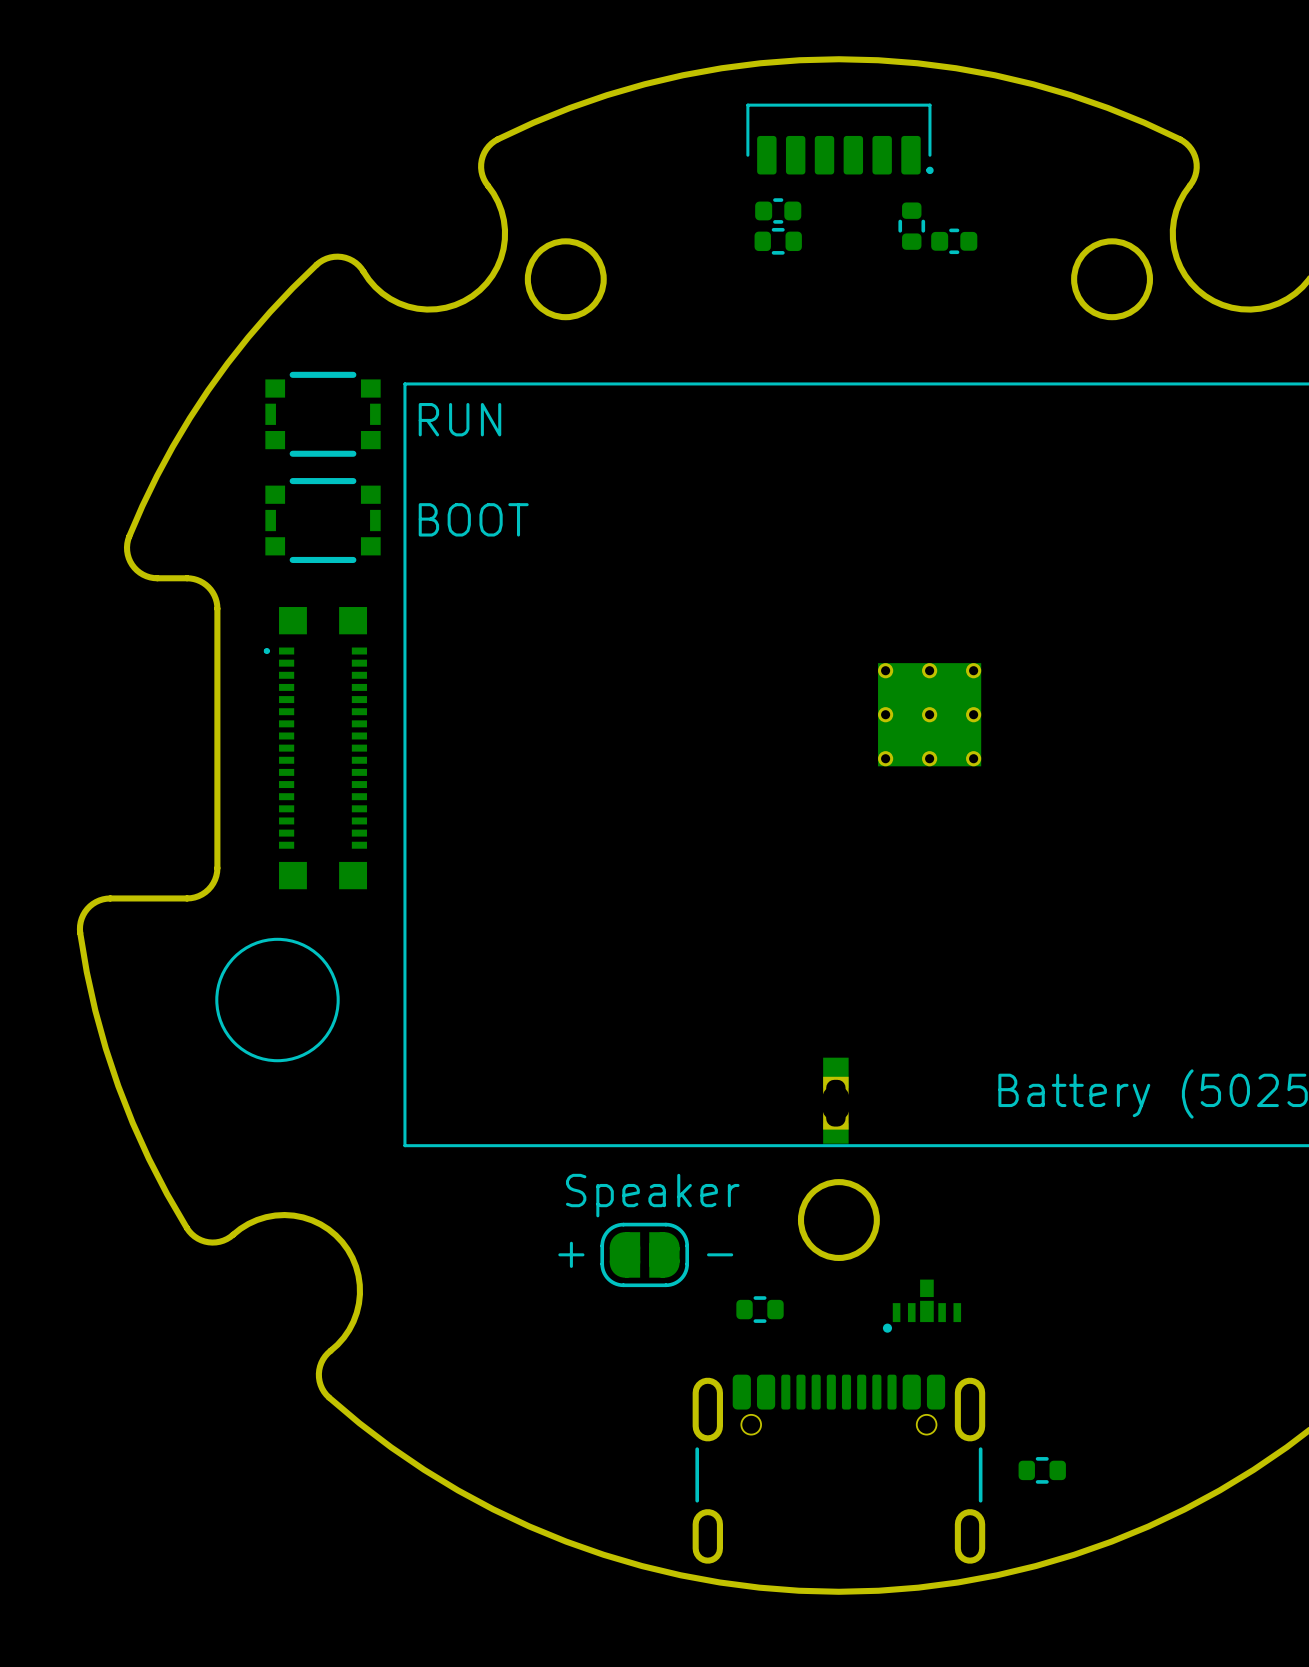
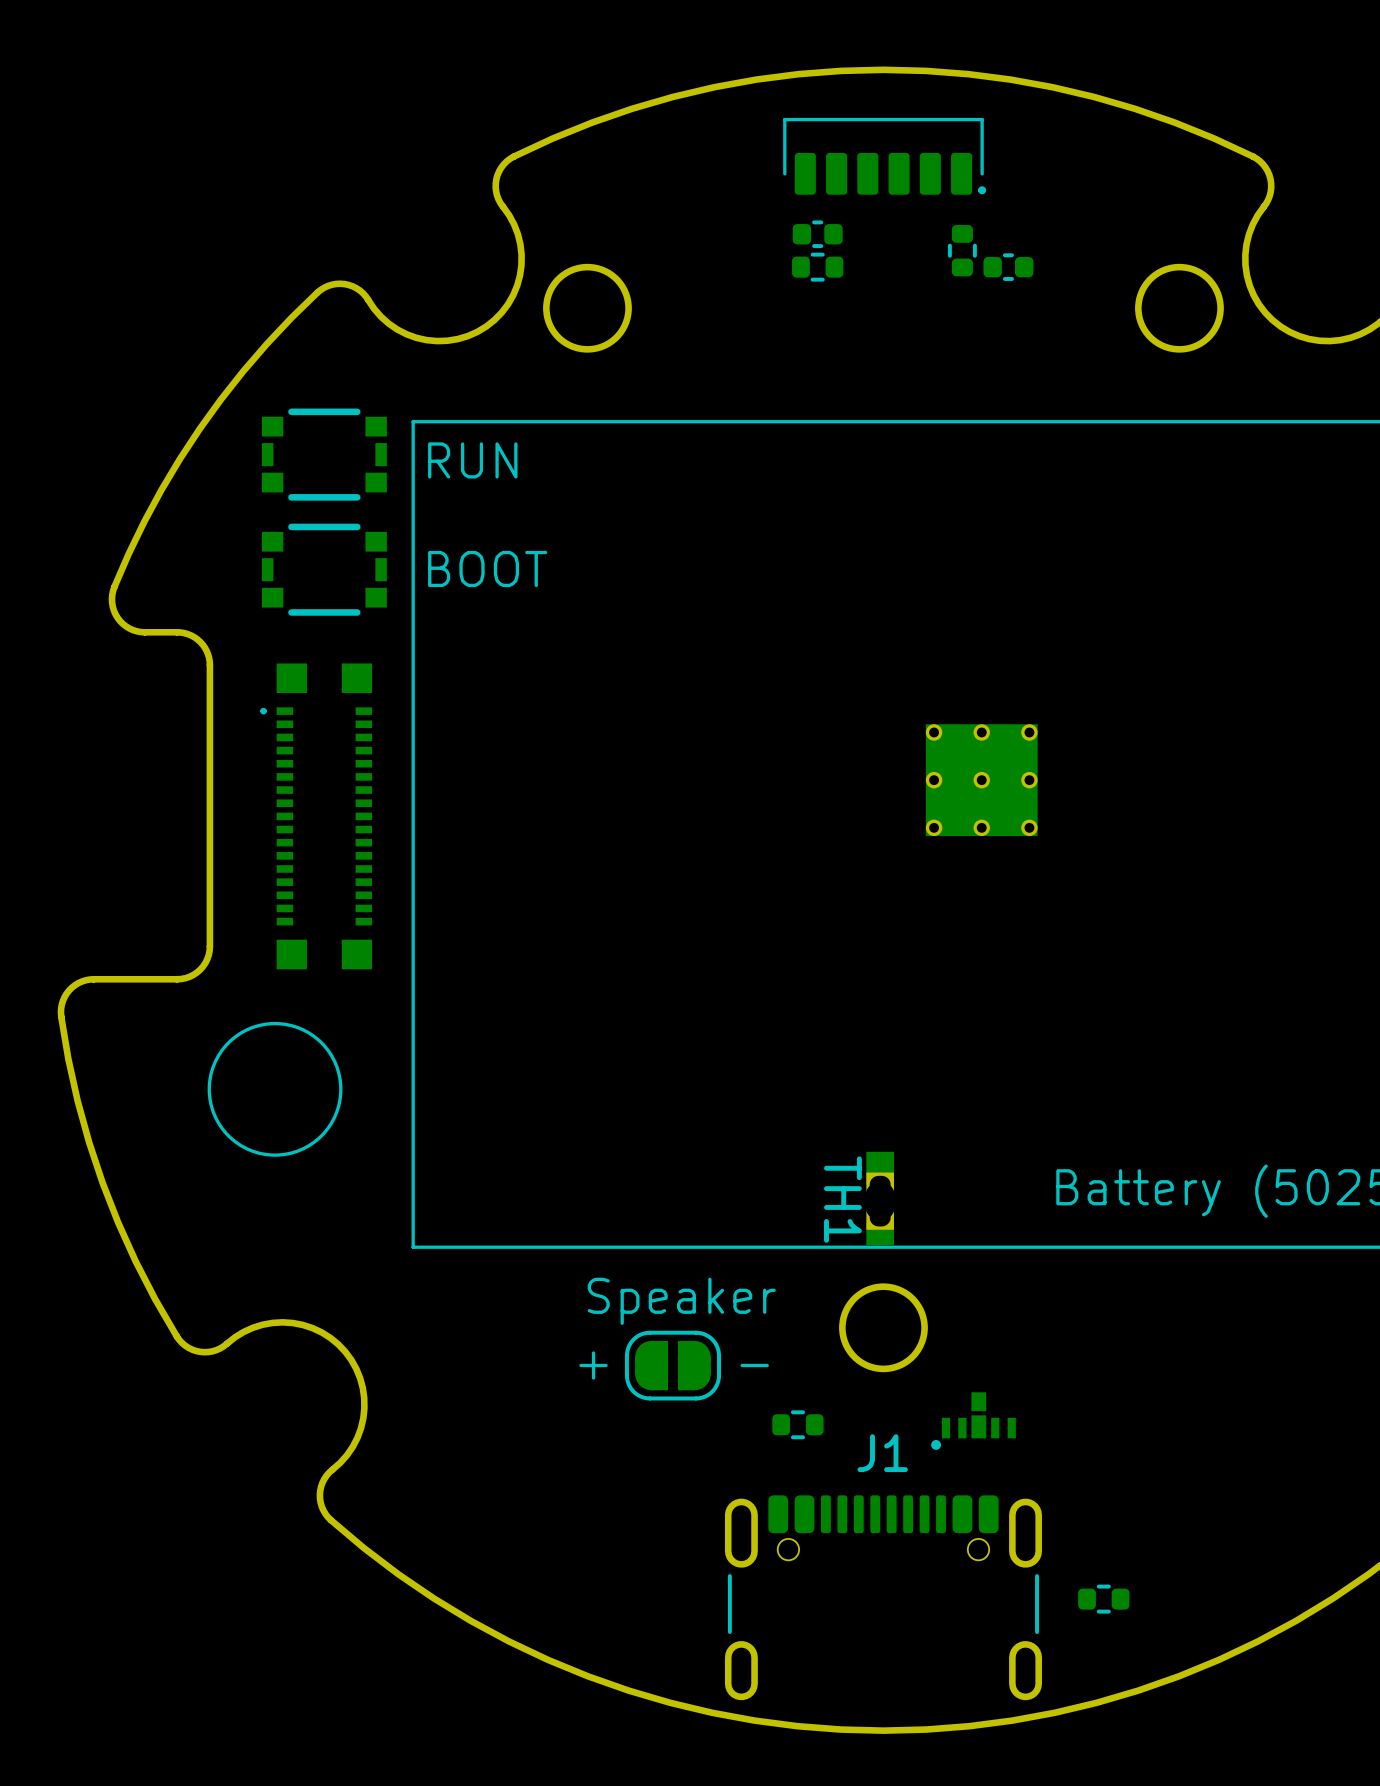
TH1 name: none -> TH1 (842, 1199)
J1 name: none -> J1 (882, 1453)

